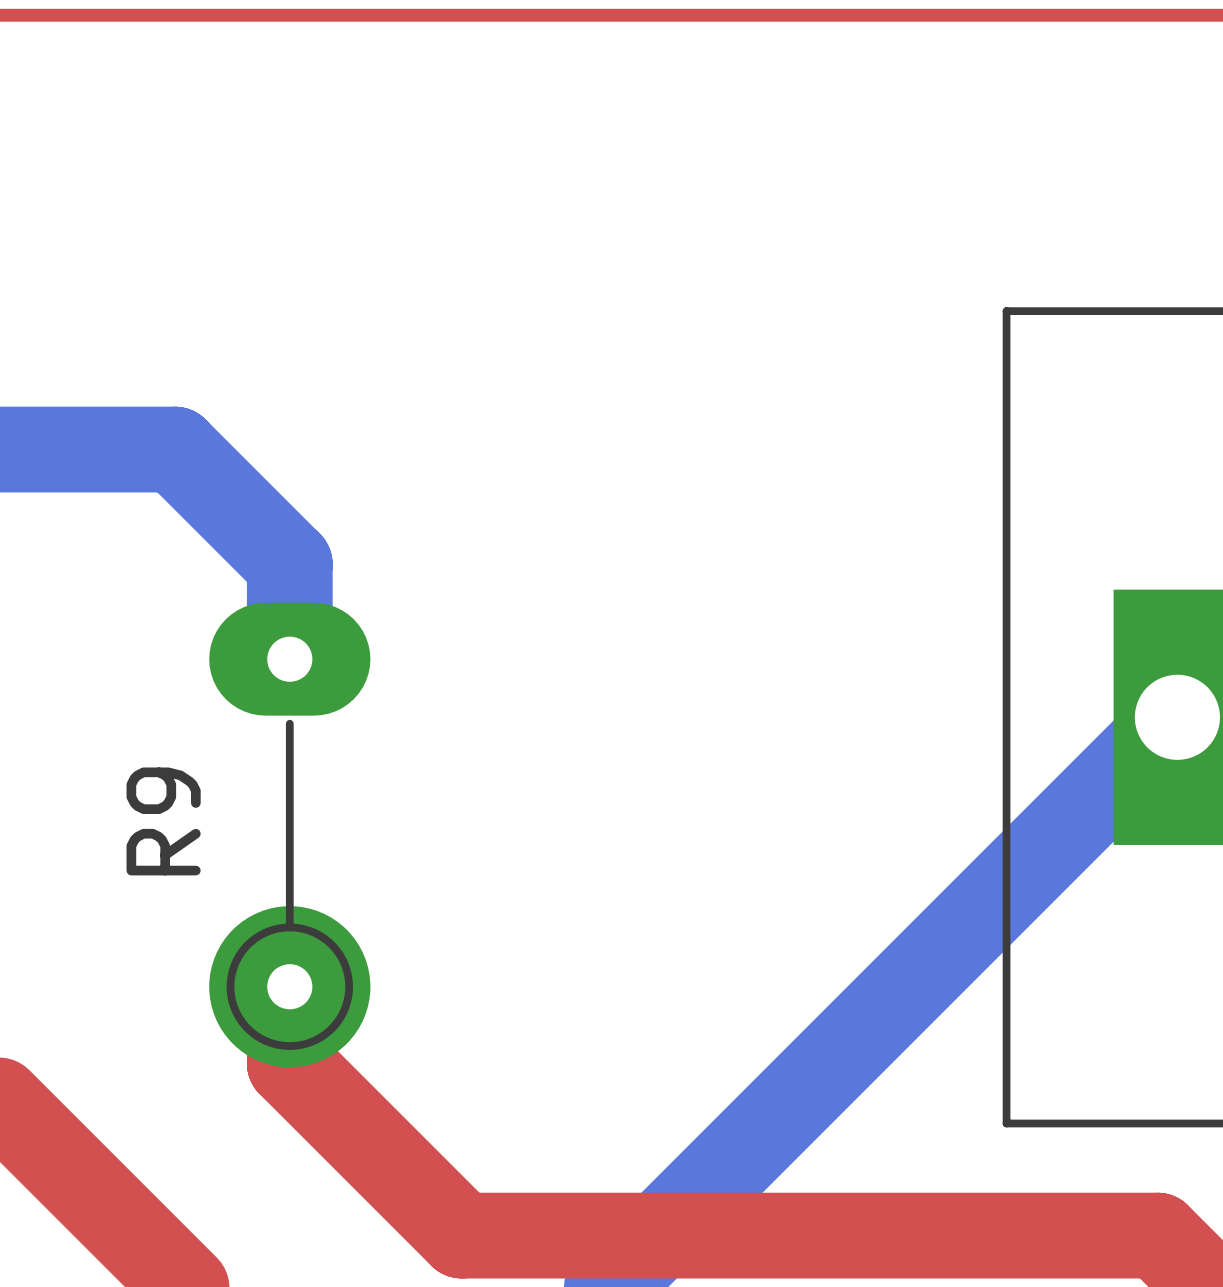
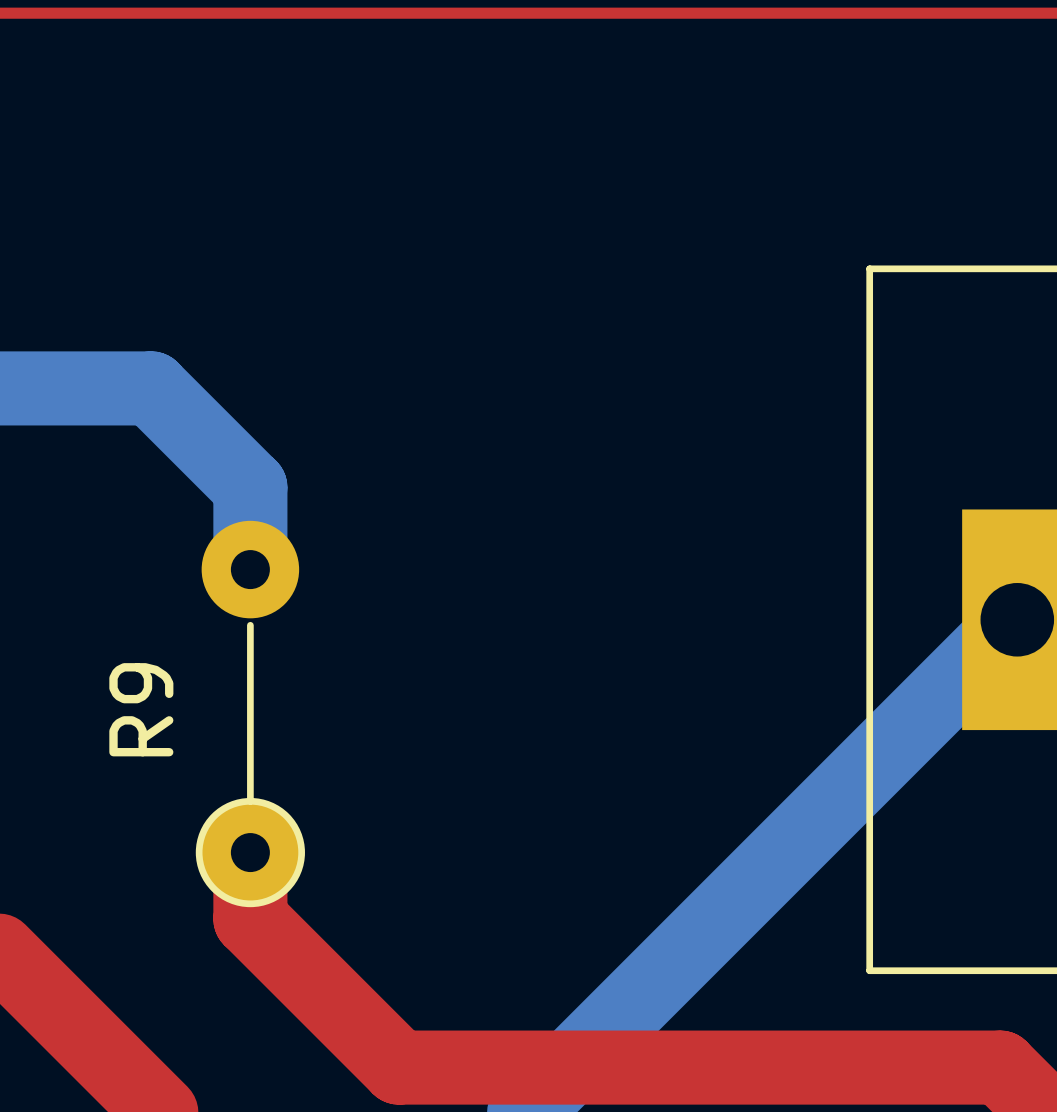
R9 footprint: [209, 602, 371, 1068] -> [195, 520, 305, 908]

